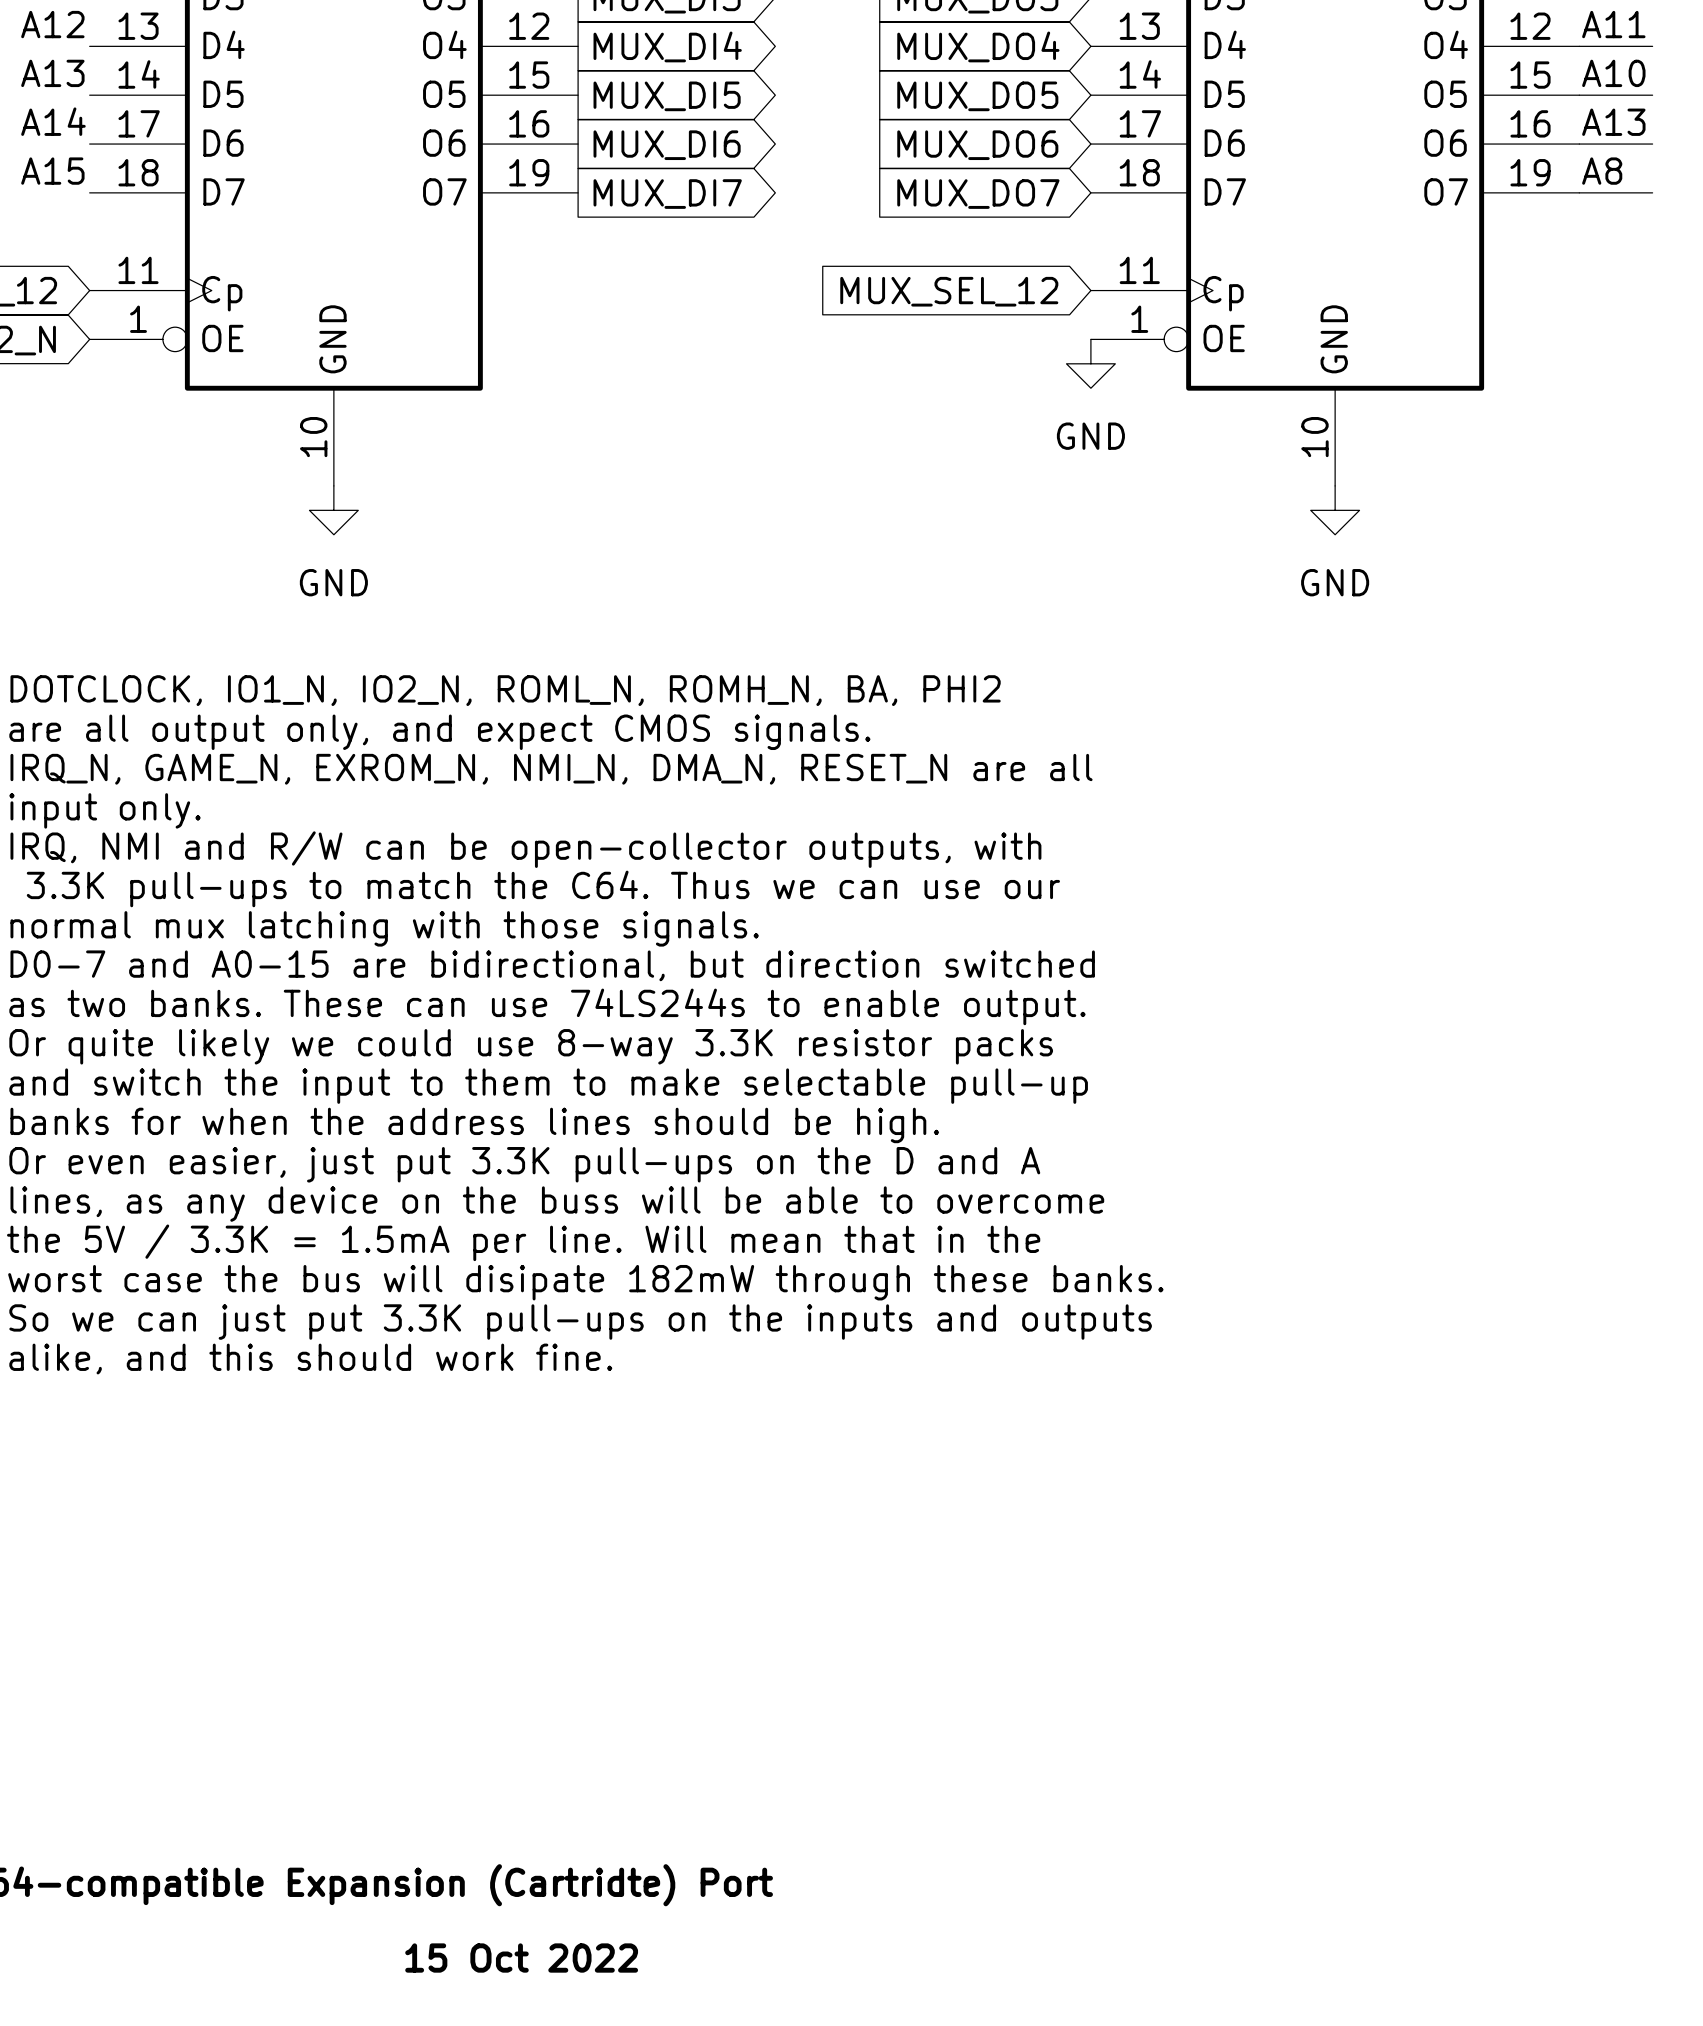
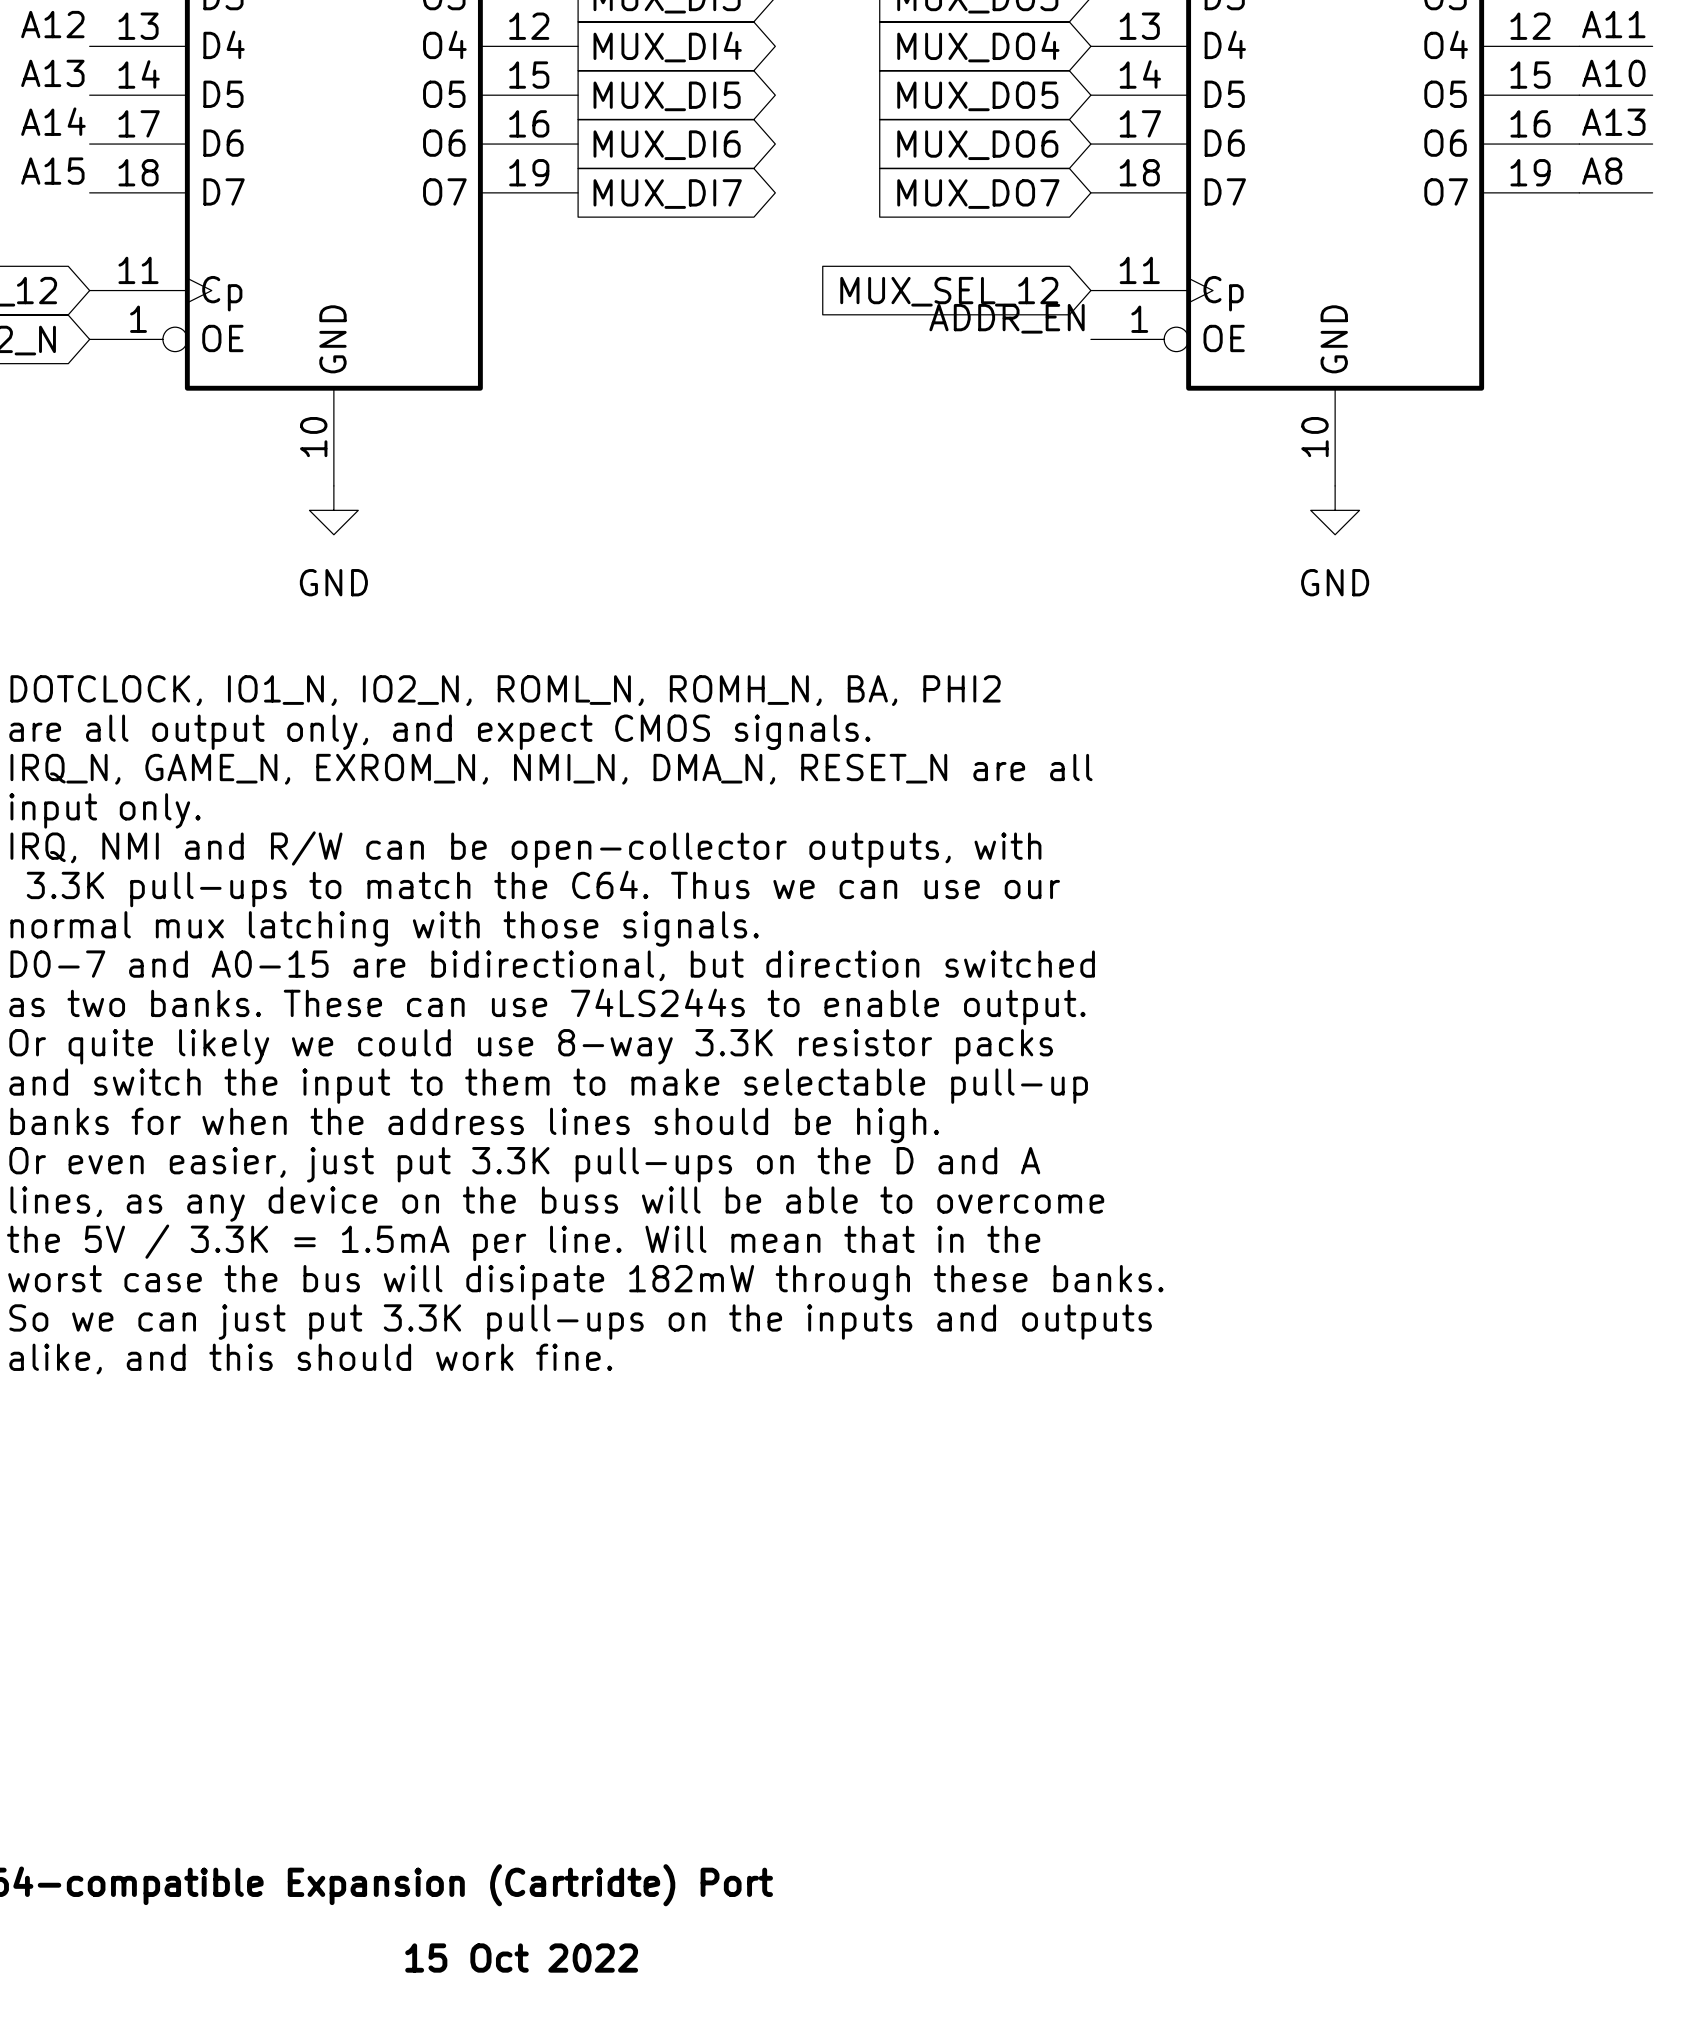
label: none -> ADDR_EN (1007, 318)
power symbol: GND (1090, 363) -> none

